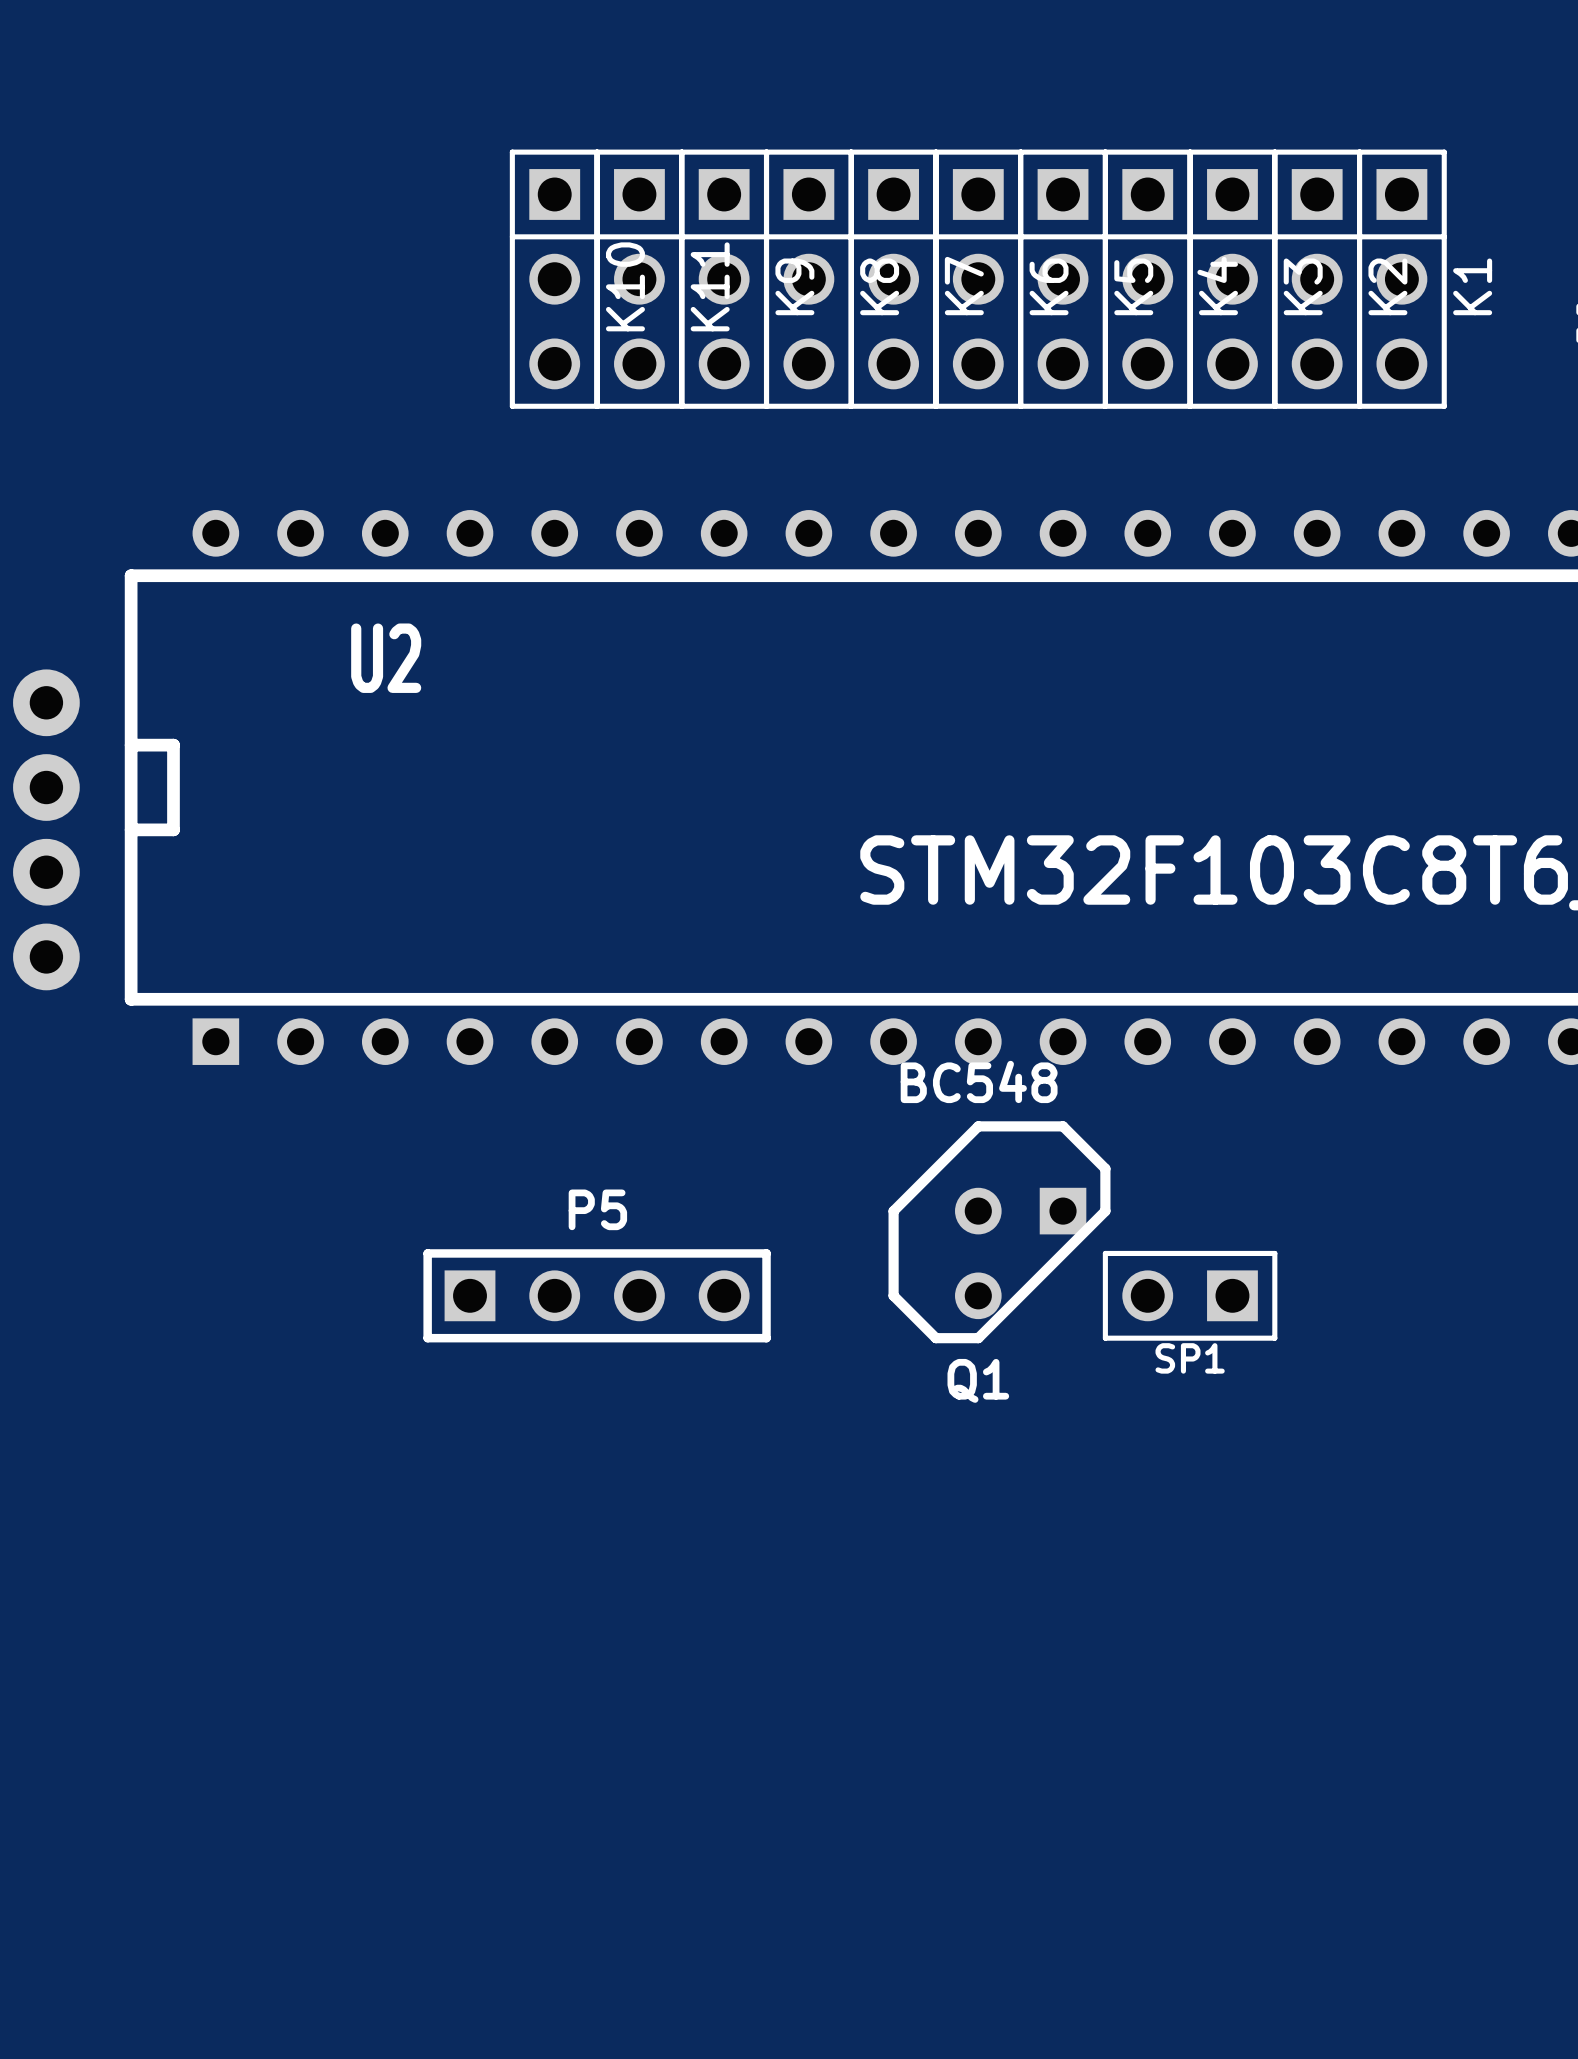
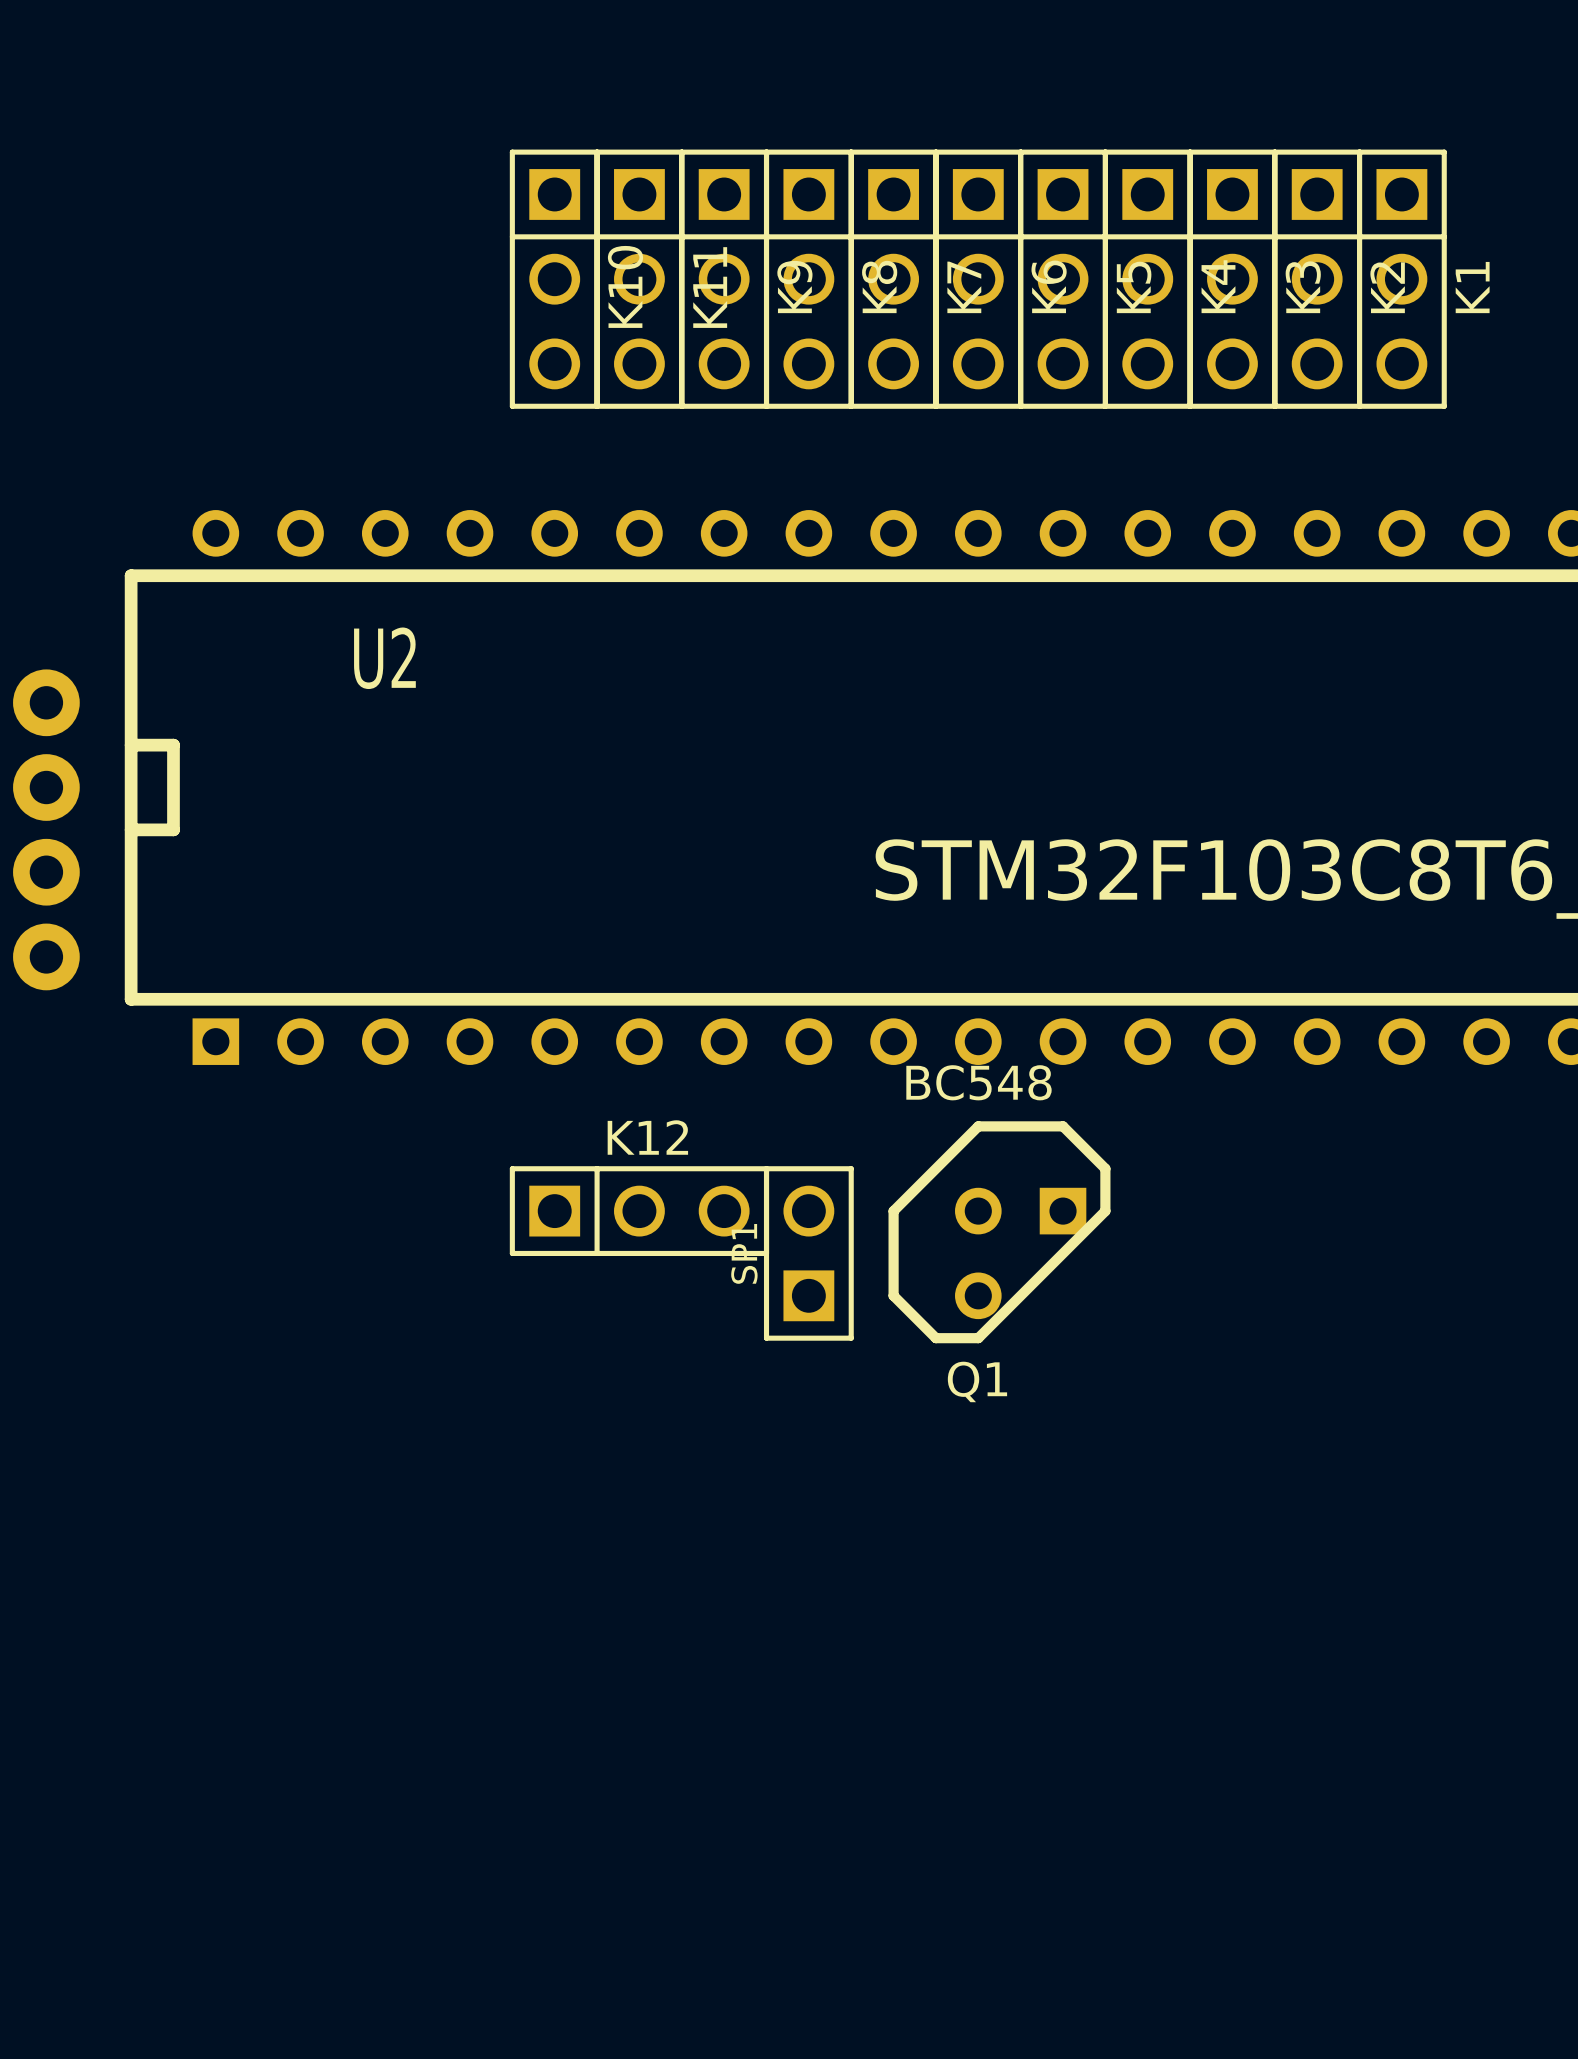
K12: none -> (639, 1211)
P5: (597, 1295) -> none
SP1 rotation: 0° (1190, 1295) -> 90° clockwise (808, 1253)
SP1 position: (1190, 1295) -> (808, 1253)

